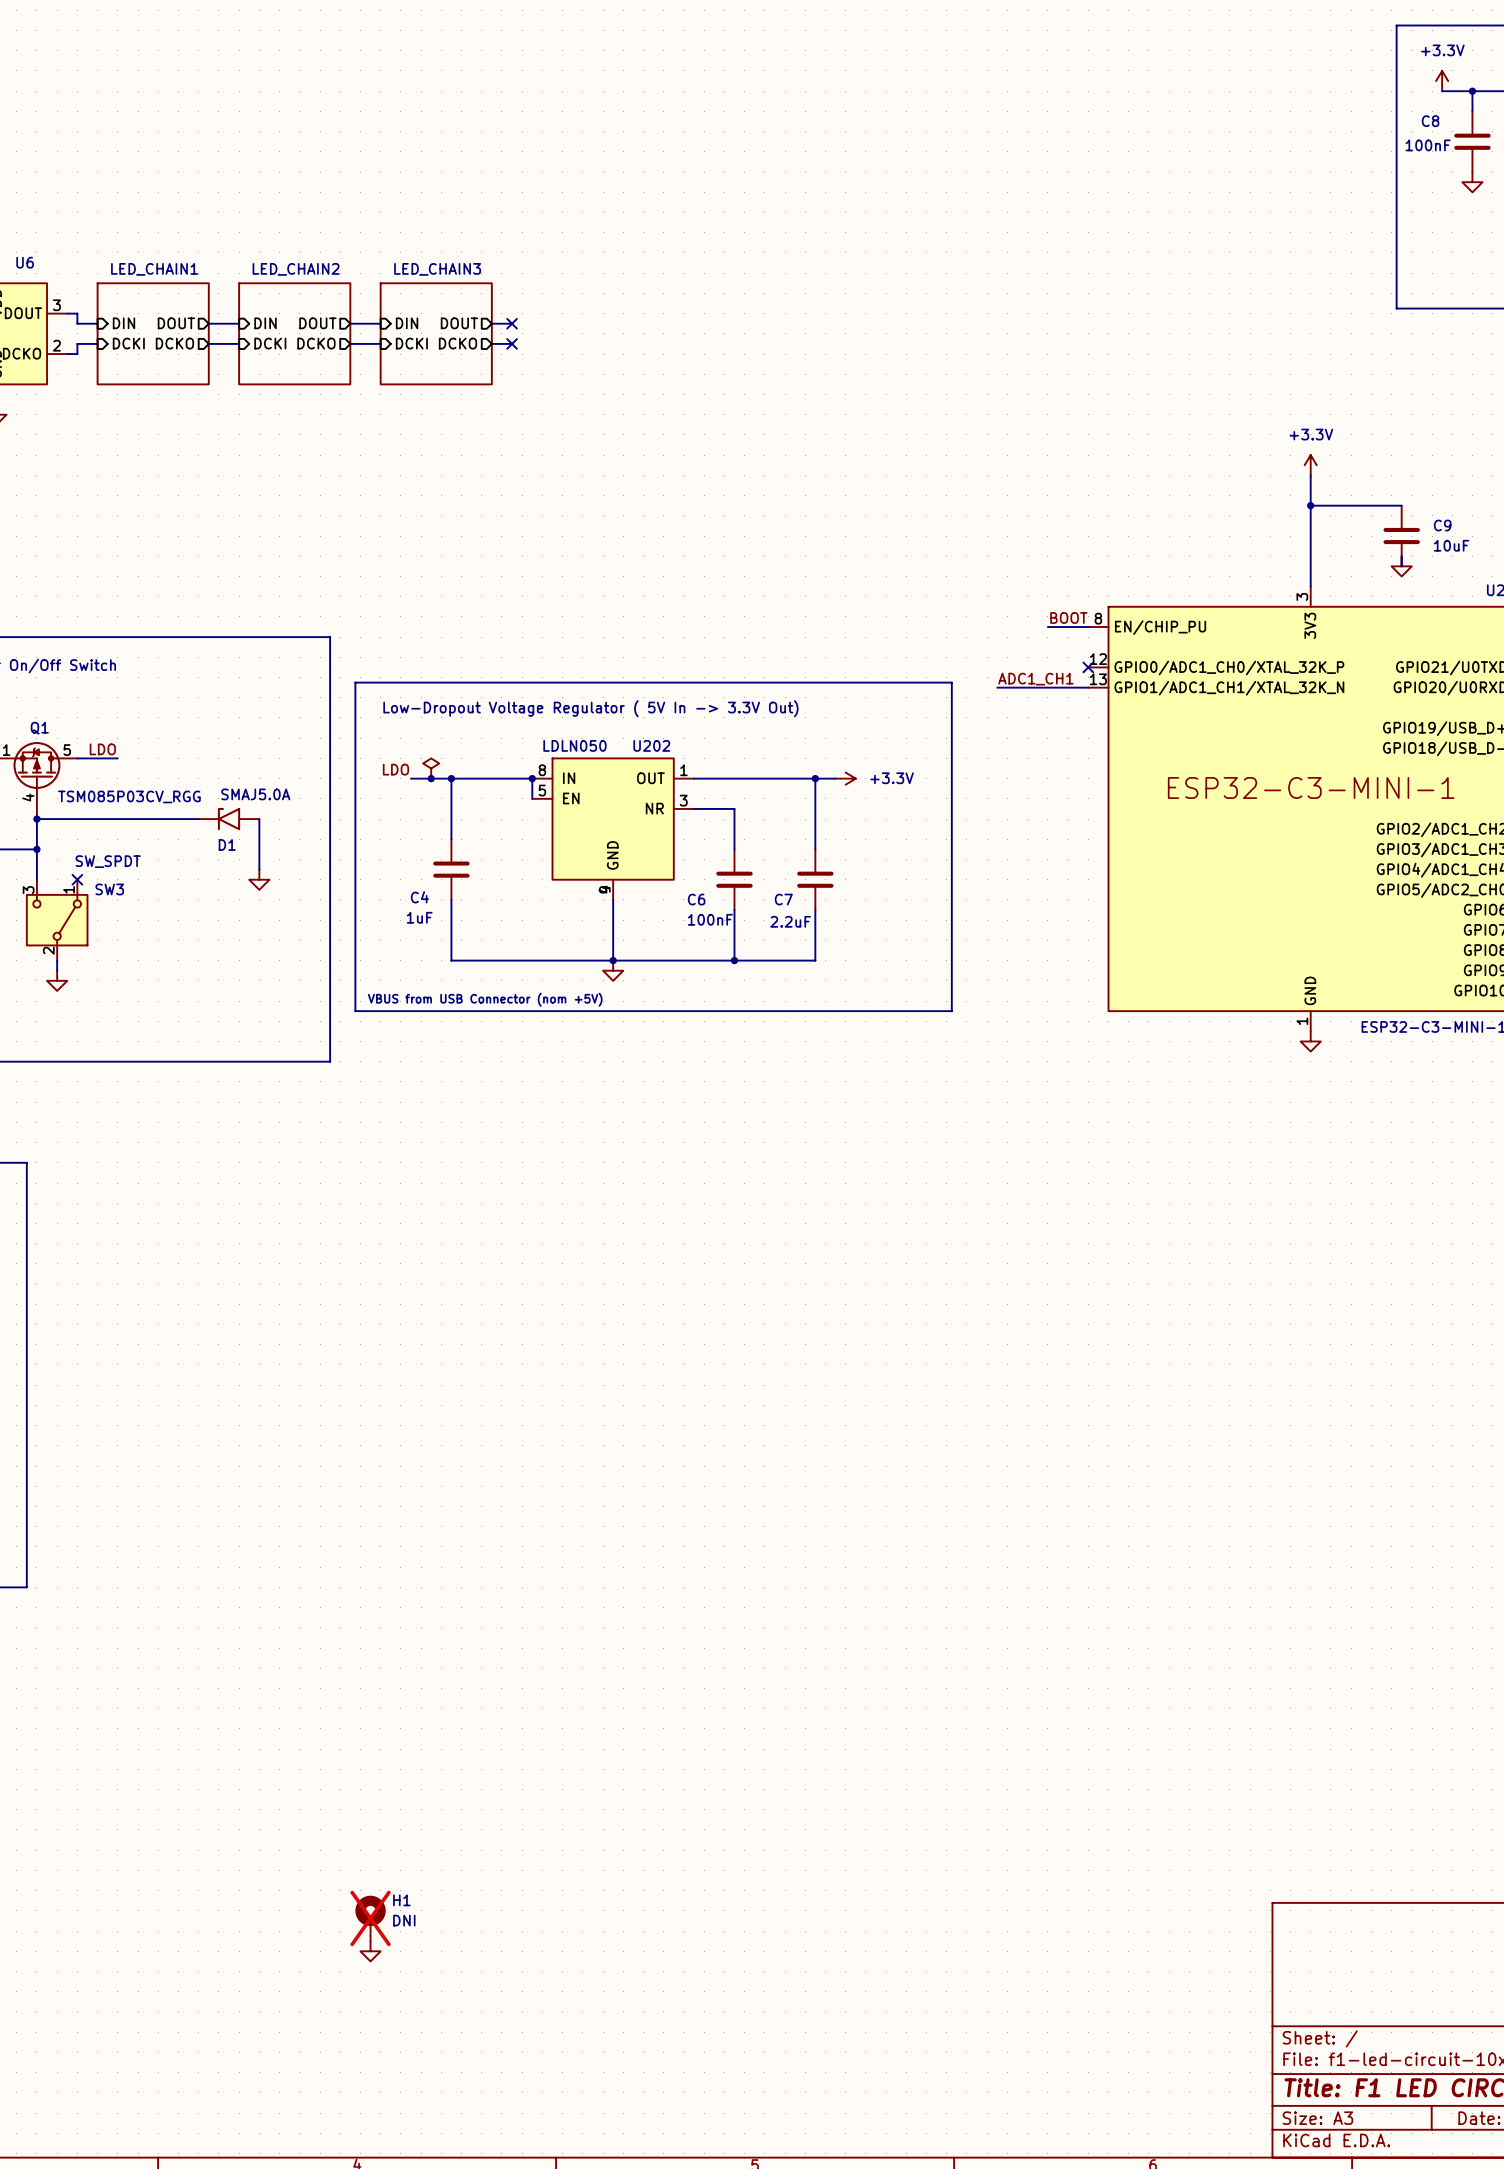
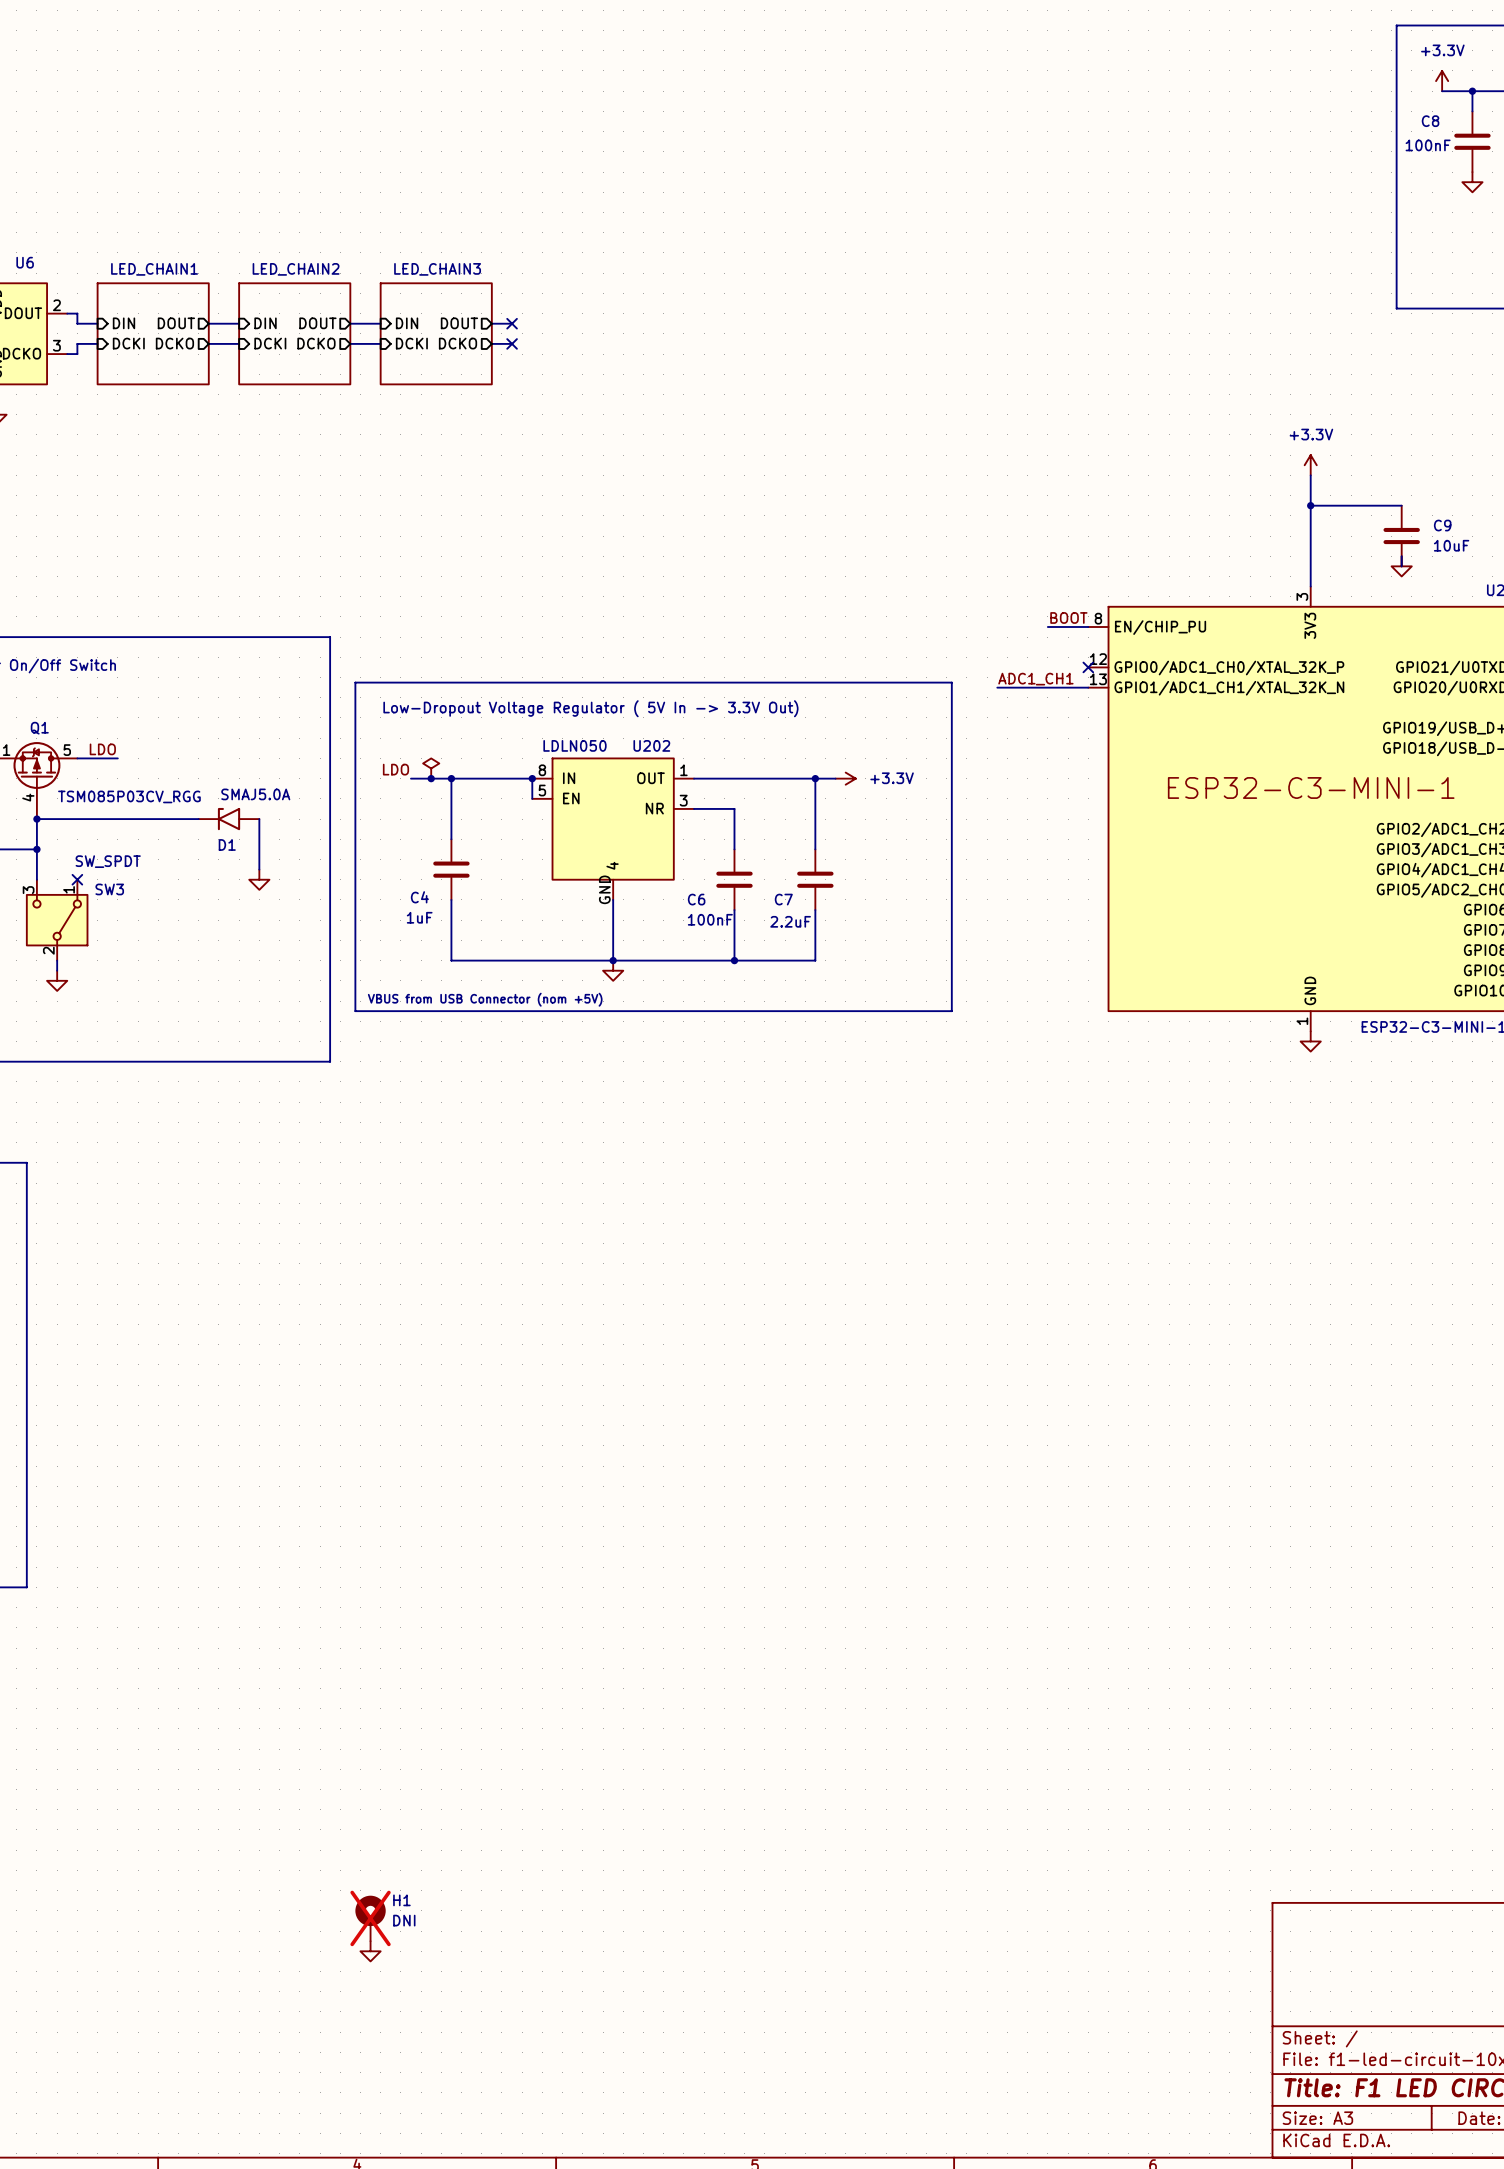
U6 pin number: 3 (56, 305) -> 2 (56, 305)
U6 pin number: 2 (56, 345) -> 3 (56, 345)
U202 symbol: [532, 758, 695, 900] -> [532, 758, 695, 900]

